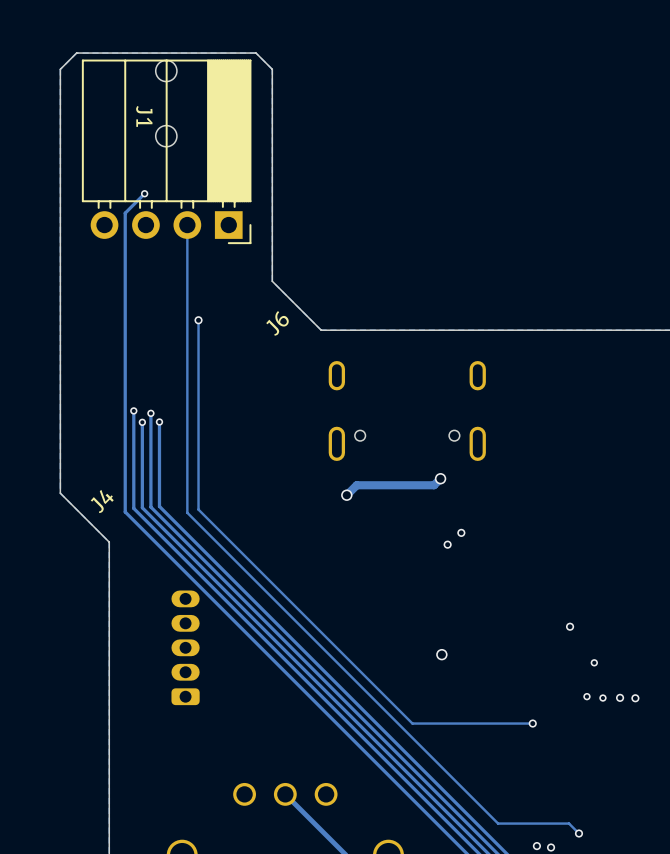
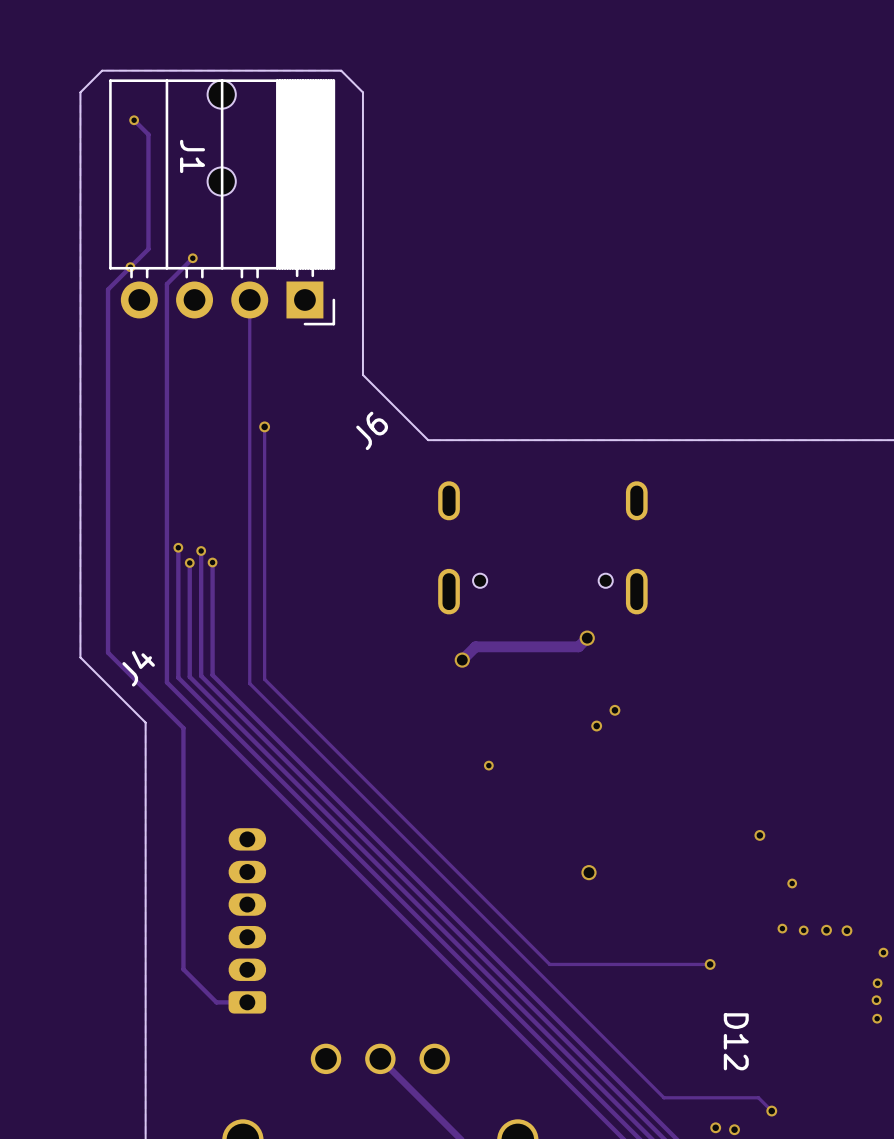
track: none -> (134, 120) (148, 134) (148, 249) (108, 289) (108, 652) (183, 728) (183, 969) (216, 1002) (247, 1002)
via: none -> (134, 120)
via: none -> (130, 267)
via: none -> (488, 765)
part: (185, 647) -> none
part: none -> (247, 920)
via: none -> (883, 952)
via: none -> (877, 983)
via: none -> (876, 1000)
via: none -> (877, 1018)
D12: none -> (736, 1041)

